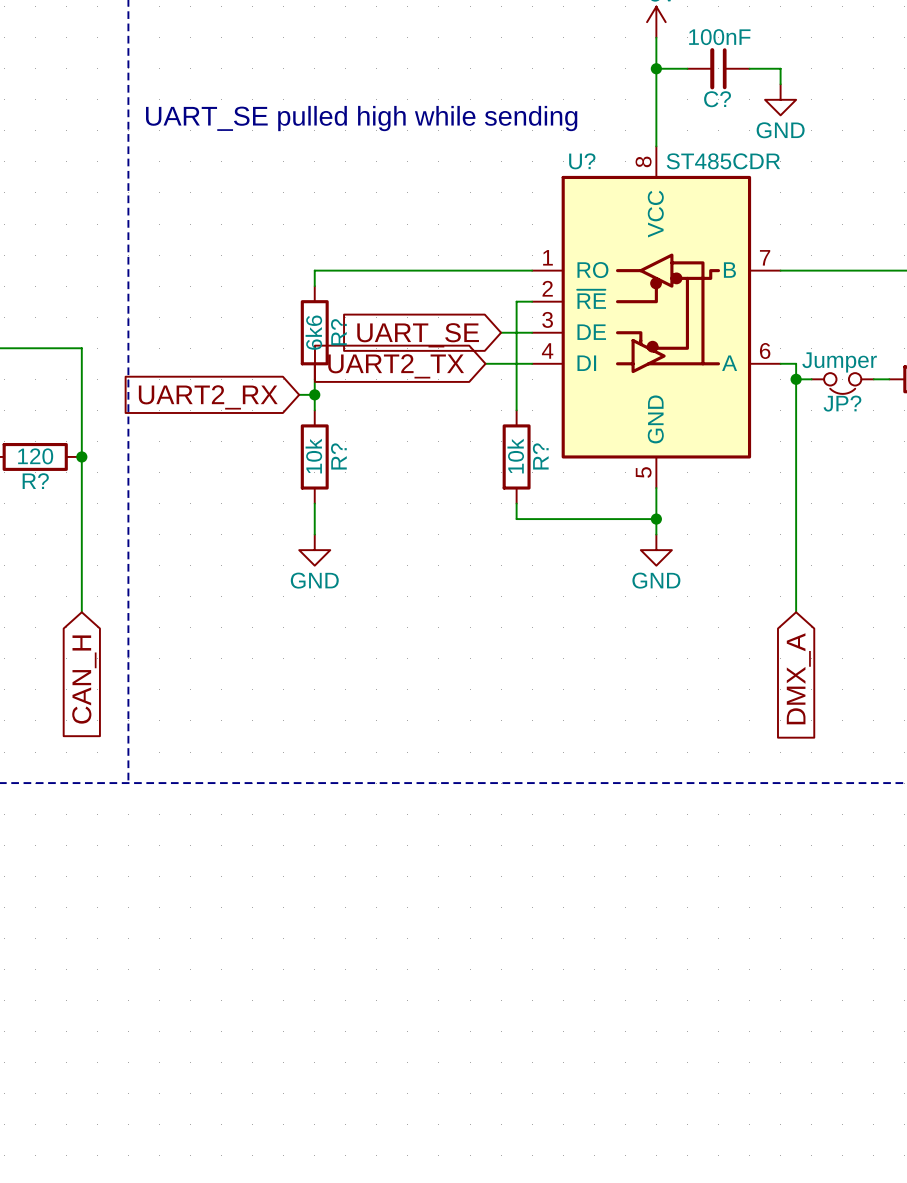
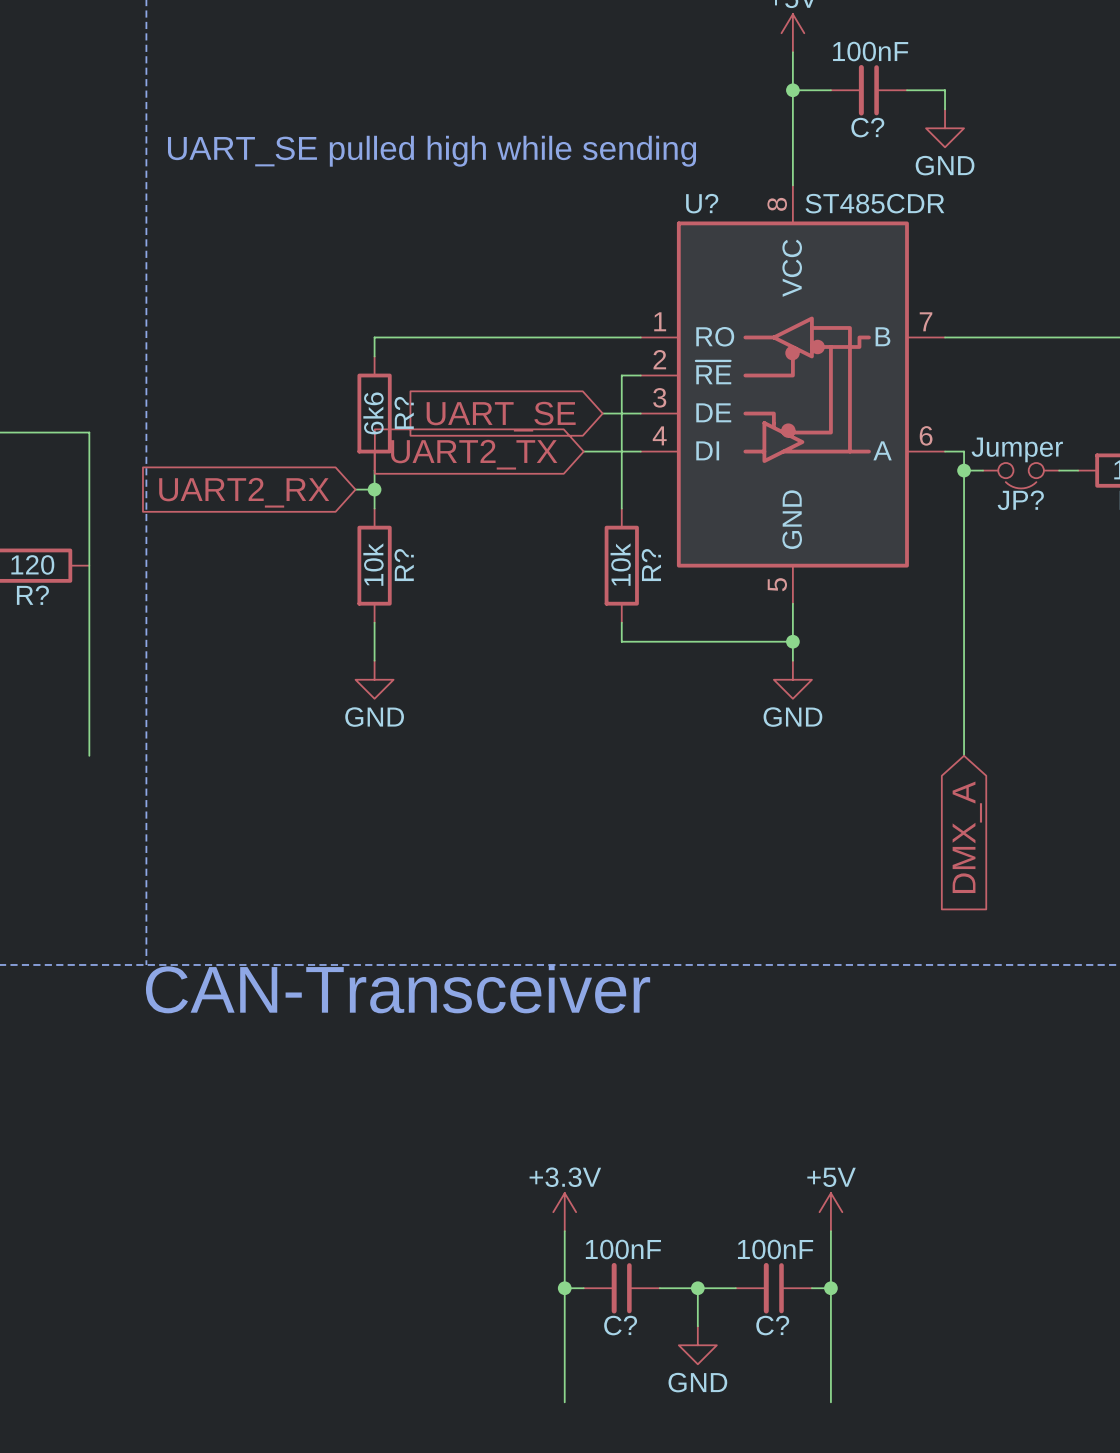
junction: (81, 456) -> none
global label: CAN_H (84, 679) -> none
text: none -> CAN-Transceiver (398, 988)
power symbol: none -> +3.3V (564, 1212)
power symbol: none -> +5V (830, 1212)
wire: none -> (564, 1231) (564, 1402)
wire: none -> (830, 1231) (830, 1402)
wire: none -> (564, 1288) (583, 1288)
junction: none -> (564, 1288)
C?: none -> 100nF (621, 1288)
wire: none -> (659, 1288) (735, 1288)
wire: none -> (697, 1288) (697, 1326)
junction: none -> (697, 1288)
C?: none -> 100nF (773, 1288)
wire: none -> (811, 1288) (830, 1288)
junction: none -> (830, 1288)
power symbol: none -> GND (697, 1345)

